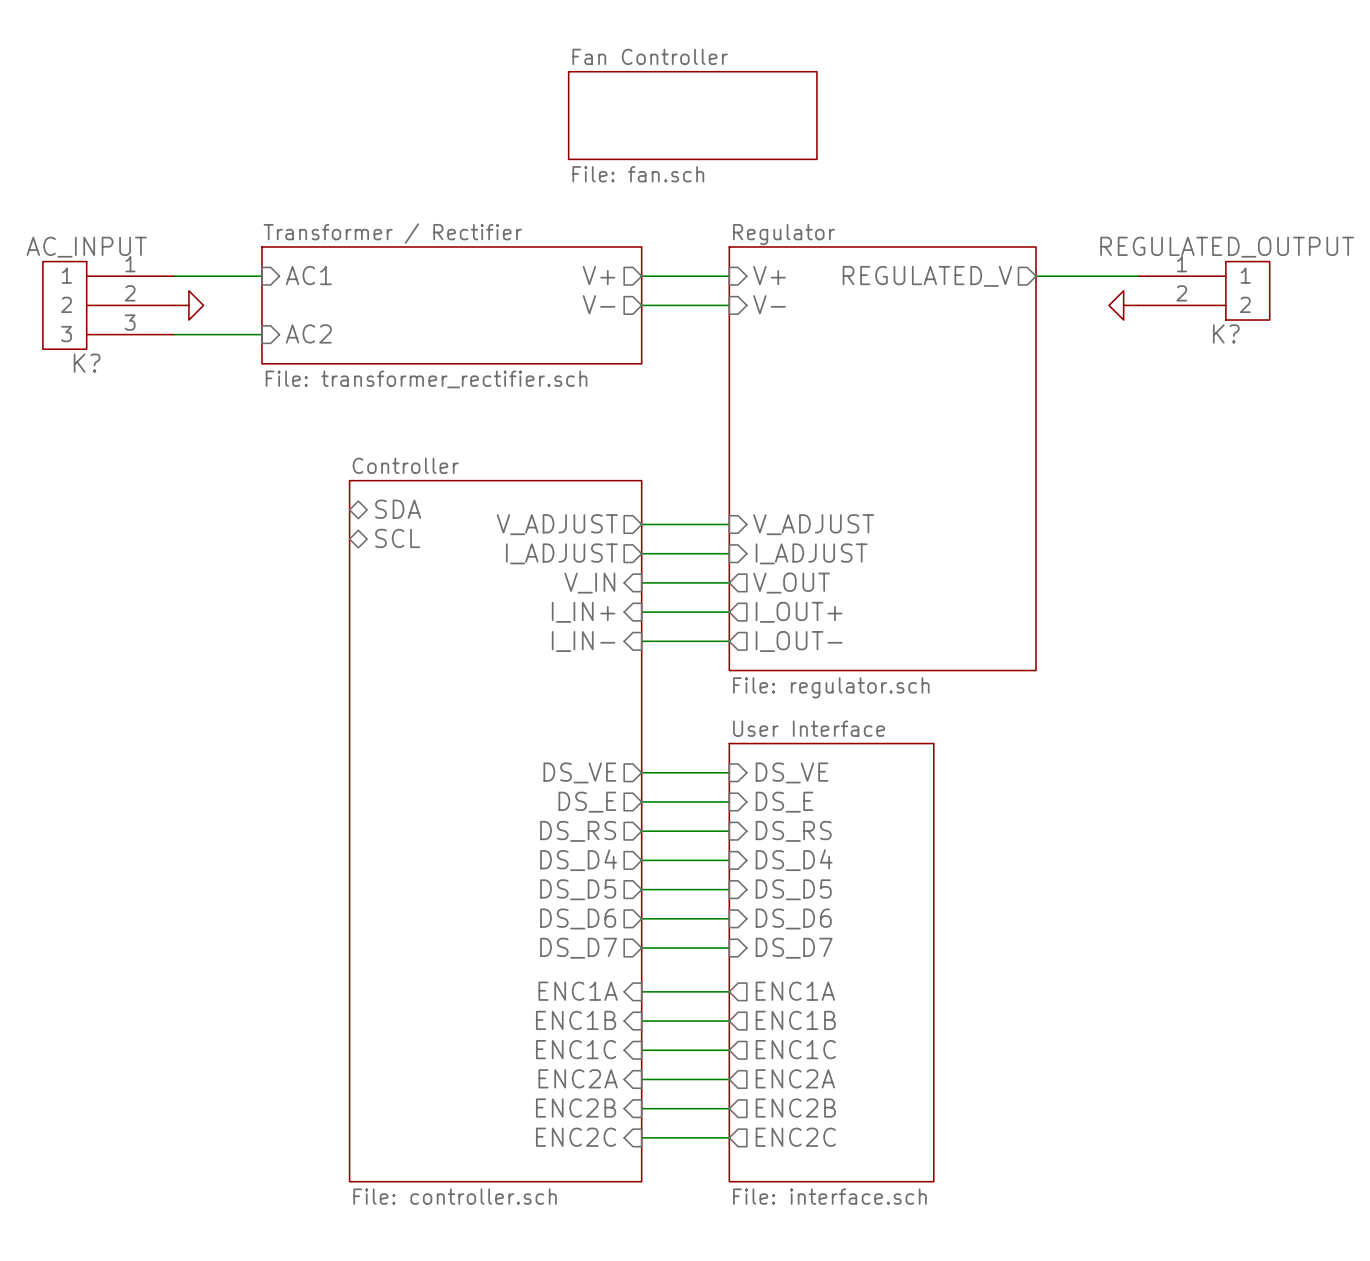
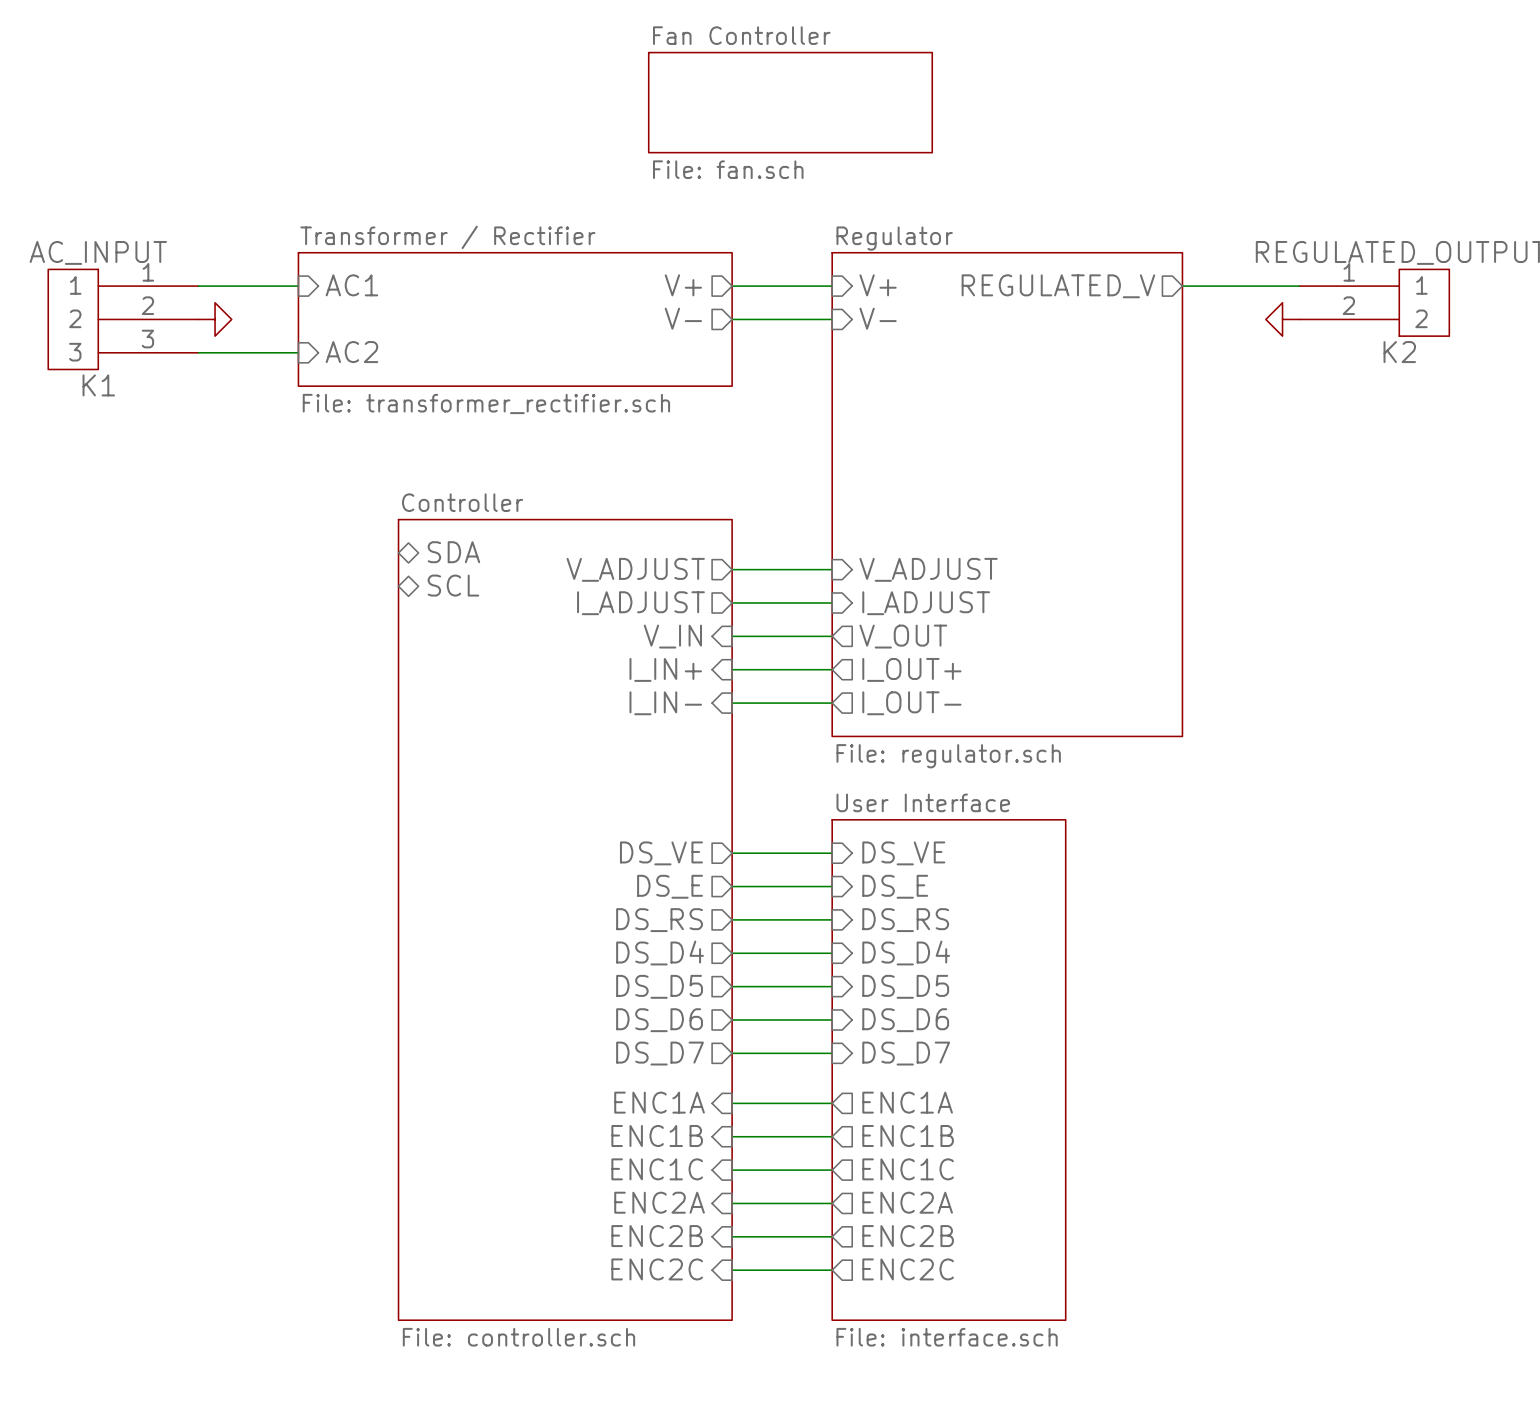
K? name: K? (1226, 333) -> K2 (1399, 352)
K? name: K? (87, 363) -> K1 (98, 385)

